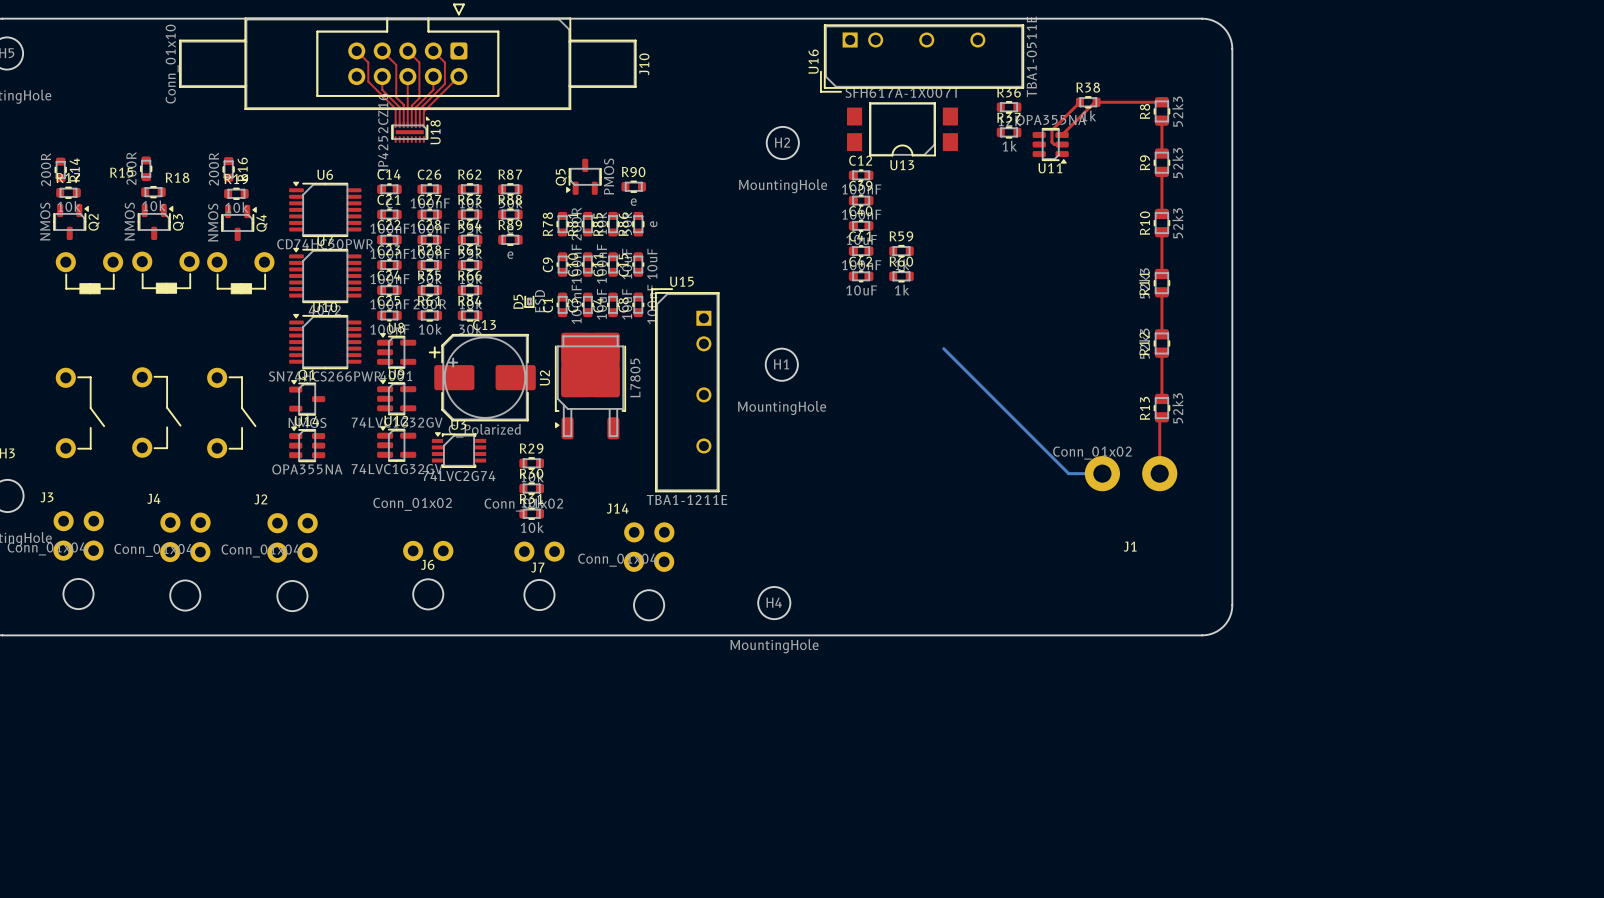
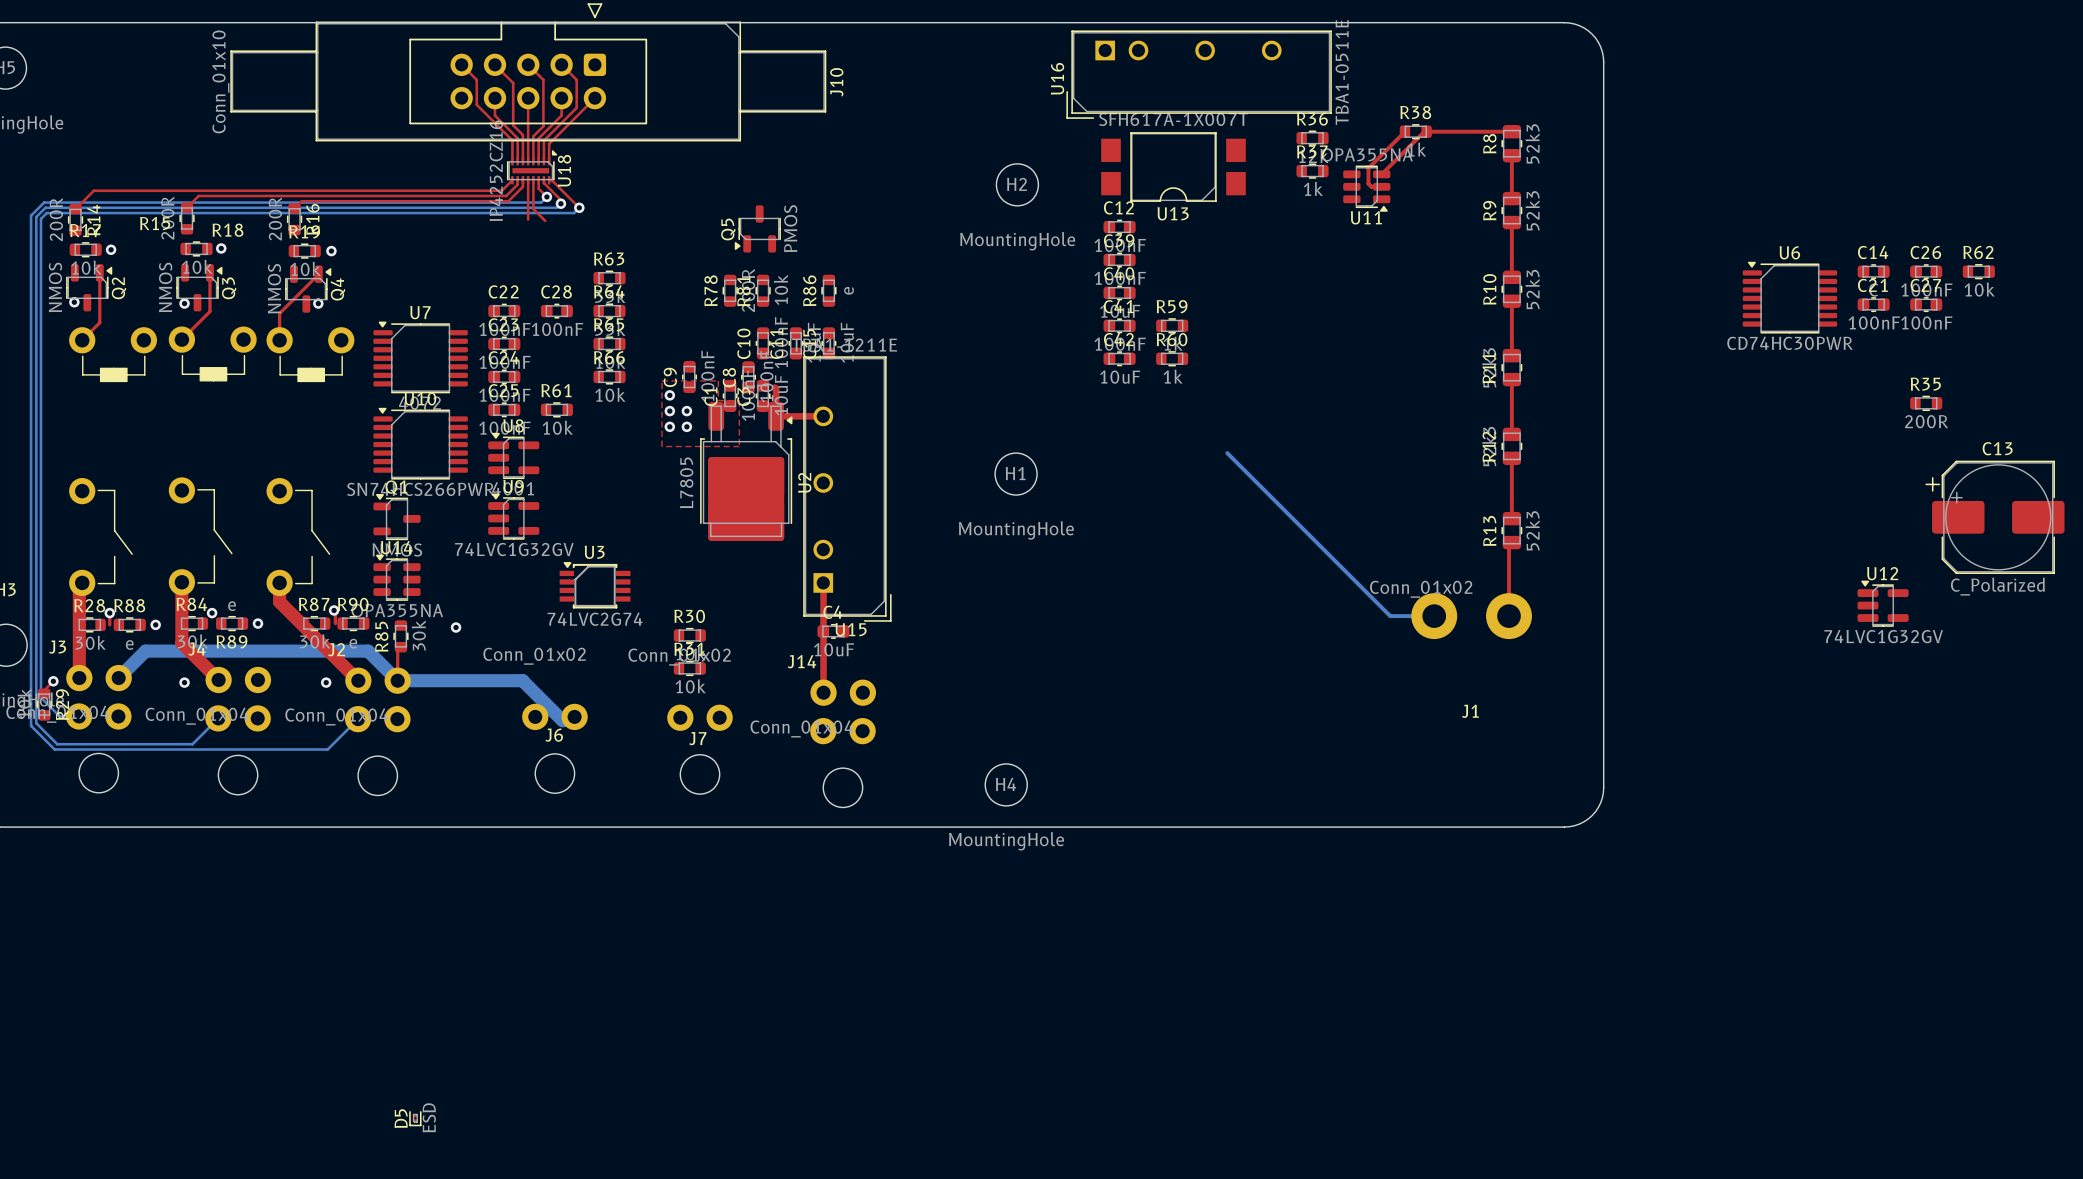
top track: none -> (512, 180) (501, 190) (93, 190) (75, 209)
top track: none -> (517, 180) (517, 184) (506, 196) (198, 196) (187, 207)
top track: none -> (522, 180) (522, 186) (508, 201) (301, 201) (294, 208)
top track: none -> (528, 180) (528, 219)
top track: none -> (533, 180) (533, 209) (545, 220)
top track: none -> (538, 180) (538, 188) (546, 196)
top track: none -> (543, 180) (543, 183) (560, 200) (560, 203)
top track: none -> (549, 180) (551, 180) (579, 207)
bottom track: none -> (546, 196) (541, 202) (44, 202) (31, 215) (31, 725) (54, 749) (327, 749) (358, 719)
via: none -> (546, 196)
bottom track: none -> (560, 203) (556, 207) (45, 207) (36, 216) (36, 723) (57, 744) (192, 744) (218, 718)
via: none -> (560, 203)
bottom track: none -> (579, 207) (574, 213) (46, 213) (40, 218) (40, 697) (59, 716) (79, 716)
via: none -> (579, 207)
R90 position: (633, 186) -> (353, 623)
C14 position: (389, 189) -> (1873, 271)
C26 position: (429, 189) -> (1926, 271)
R62 position: (470, 189) -> (1978, 271)
R87 position: (510, 189) -> (314, 623)
via: none -> (221, 248)
via: none -> (111, 249)
via: none -> (331, 251)
U6 position: (325, 209) -> (1789, 297)
top track: none -> (99, 272) (99, 322) (82, 340)
top track: none -> (209, 272) (209, 311) (181, 339)
top track: none -> (318, 274) (279, 313) (279, 340)
C21 position: (389, 214) -> (1873, 304)
C27 position: (429, 214) -> (1926, 304)
R88 position: (510, 214) -> (129, 624)
R85 position: (613, 224) -> (400, 636)
R89 name position: R89 (510, 225) -> R89 (231, 641)
via: none -> (74, 302)
via: none -> (184, 303)
via: none -> (318, 303)
R89 position: (510, 239) -> (232, 623)
R89 value position: e (510, 255) -> e (232, 606)
C9 position: (562, 264) -> (689, 377)
R28 position: (429, 265) -> (89, 624)
R35 position: (429, 290) -> (1926, 403)
top zone outline: none -> (661, 380) (661, 446) (739, 446) (739, 400) (718, 400) (718, 380) (661, 380)
top track: none -> (774, 387) (776, 416) (823, 416)
D5 position: (529, 301) -> (415, 1118)
via: none -> (669, 395)
C4 rotation: 0° (613, 304) -> 90° clockwise (833, 631)
C4 position: (613, 304) -> (833, 631)
C8 position: (638, 304) -> (748, 377)
R84 position: (470, 315) -> (192, 623)
via: none -> (669, 411)
via: none -> (686, 411)
via: none -> (669, 426)
via: none -> (686, 426)
C13 position: (482, 377) -> (1994, 517)
U2 rotation: 0° (590, 386) -> 180° (746, 471)
U15 rotation: 0° (685, 390) -> 180° (847, 489)
U12 position: (396, 443) -> (1883, 603)
top track: none -> (181, 582) (181, 643) (218, 679)
top track: none -> (82, 582) (79, 585) (79, 678)
top track: none -> (279, 582) (279, 601) (358, 680)
top track: none -> (823, 582) (823, 692)
R29 rotation: 0° (531, 463) -> 90° clockwise (44, 704)
R29 position: (531, 463) -> (44, 704)
top track: none -> (334, 610) (335, 623)
via: none -> (334, 610)
top track: none -> (109, 613) (109, 624)
via: none -> (109, 613)
via: none -> (212, 613)
via: none -> (257, 623)
via: none -> (155, 624)
via: none -> (456, 627)
top track: none -> (400, 647) (397, 650) (397, 680)
bottom track: none -> (118, 678) (145, 651) (368, 651) (397, 680) (522, 680) (562, 720)
top track: none -> (53, 681) (44, 690)
via: none -> (53, 681)
via: none -> (184, 682)
via: none -> (326, 682)

